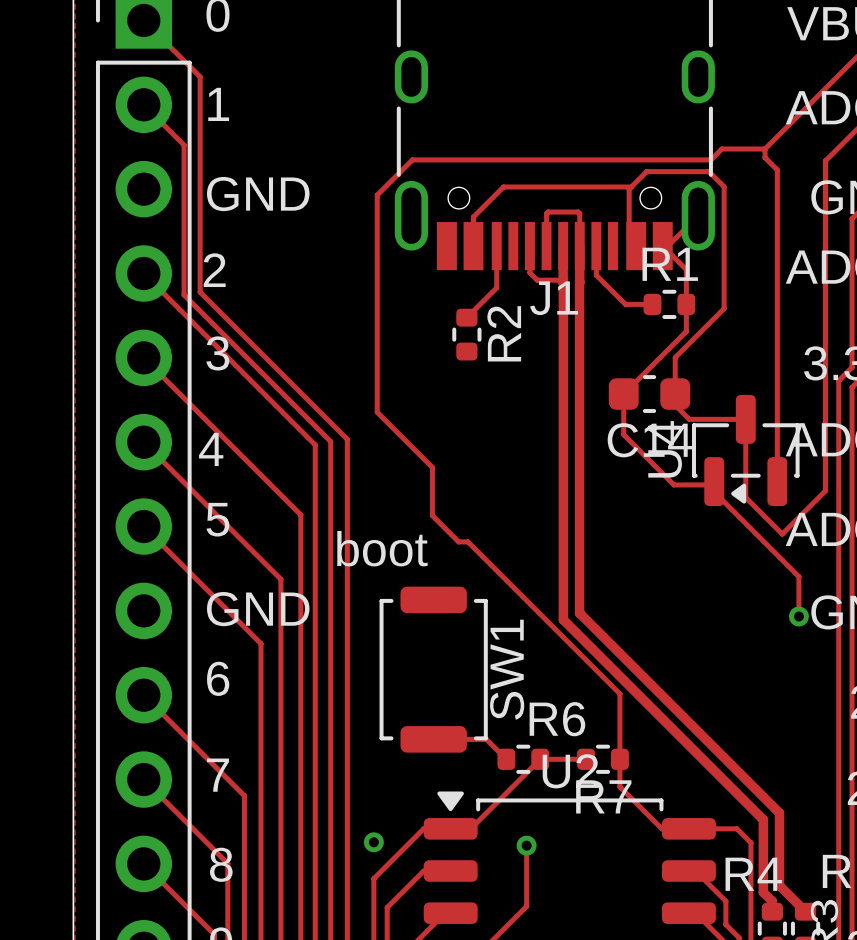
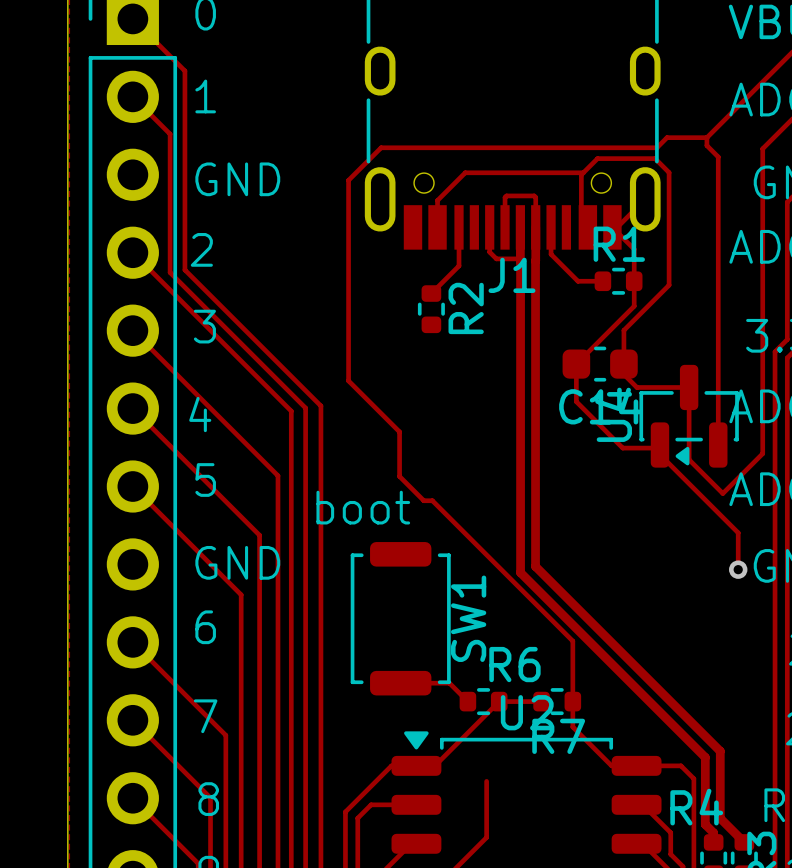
via: (373, 842) -> none
via: (526, 845) -> none
track: (423, 871) (387, 907) -> (391, 804) (371, 804) (357, 818) (357, 838)

